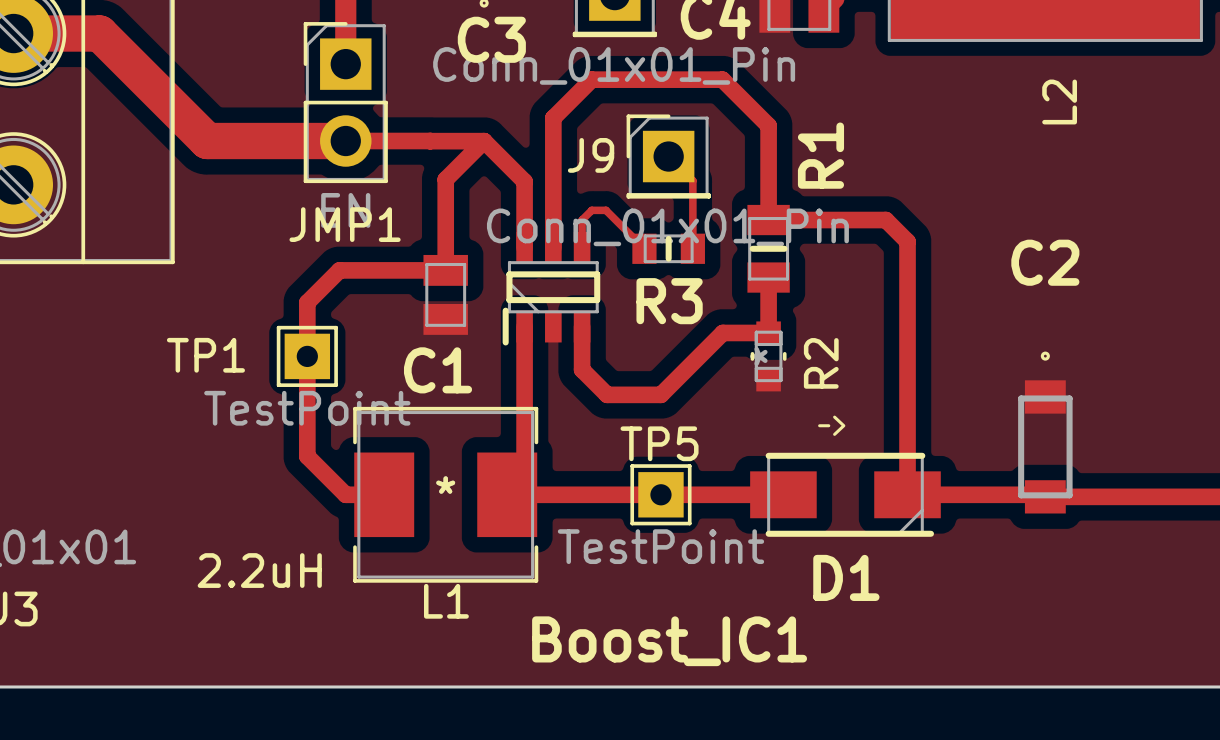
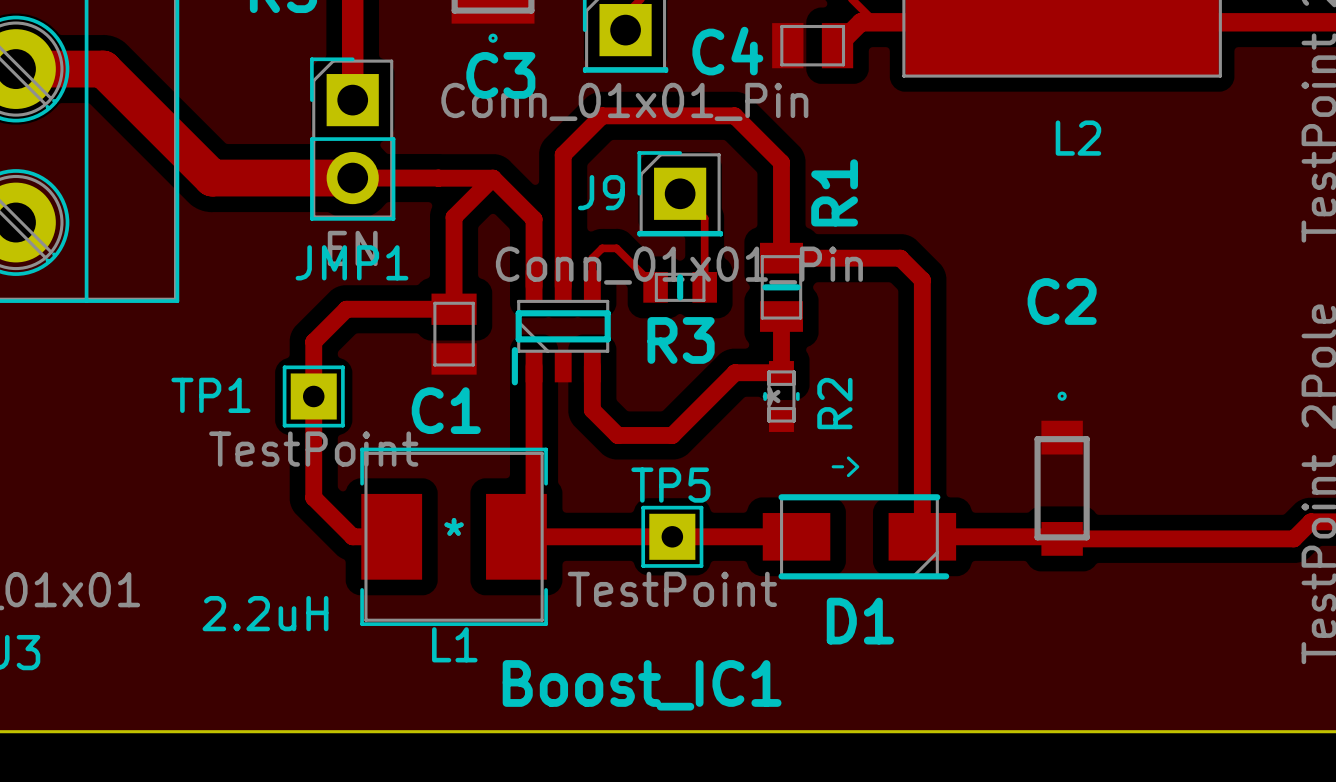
L2 name rotation: 0° (1059, 102) -> 90° clockwise (1078, 138)
Boost_IC1 name position: Boost_IC1 (669, 641) -> Boost_IC1 (642, 685)

